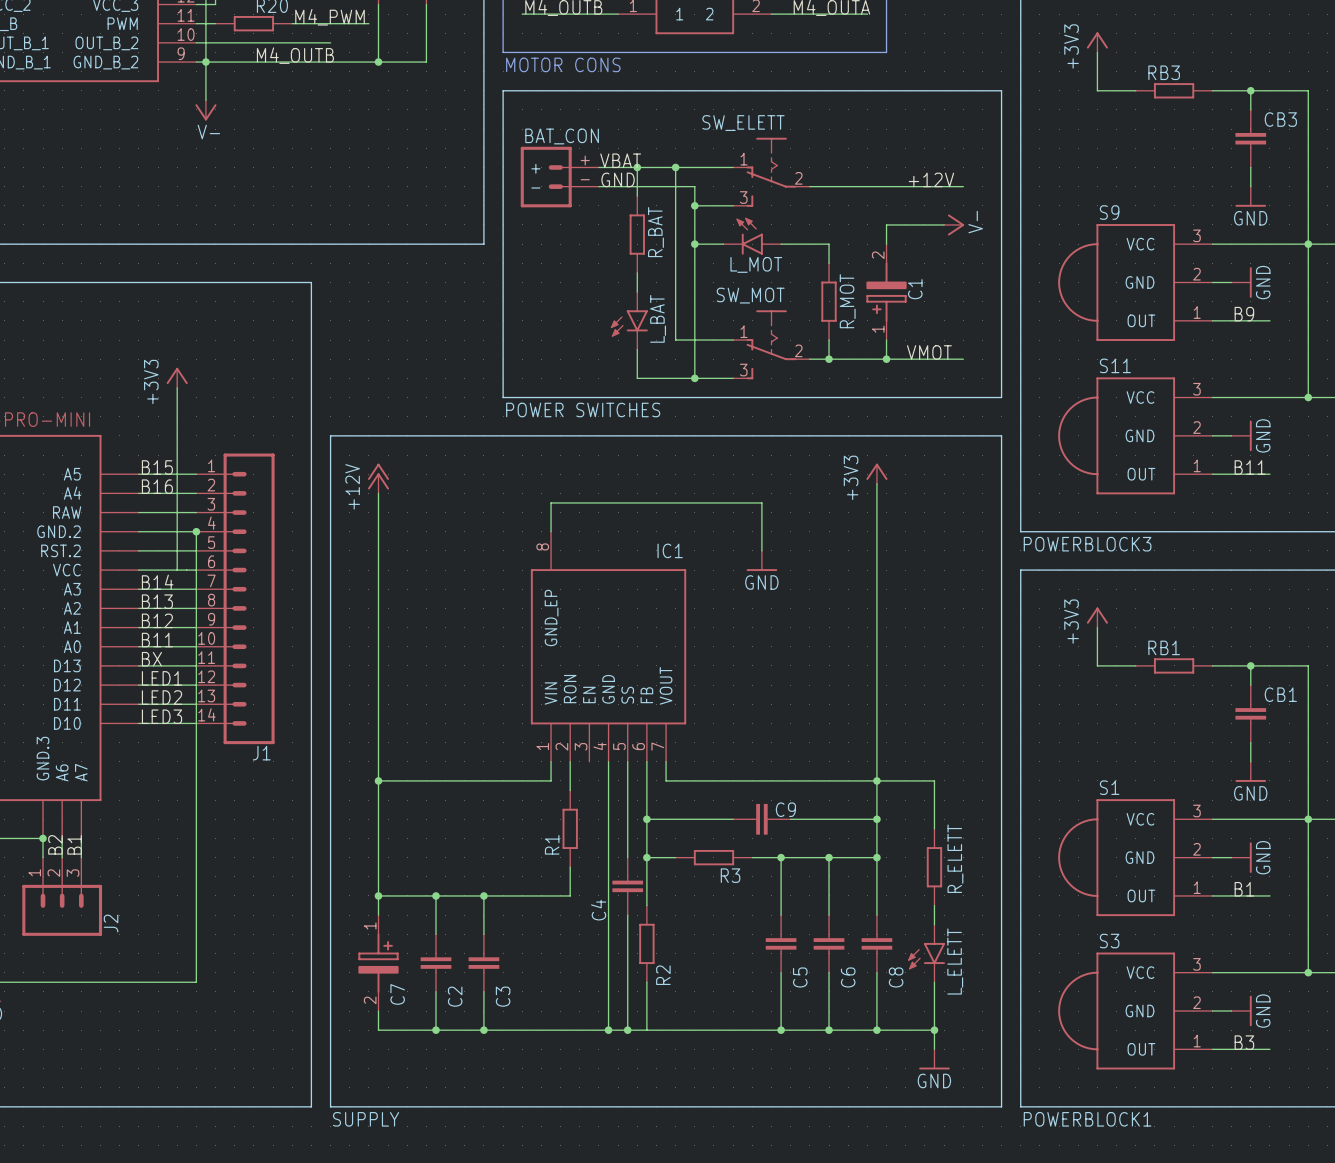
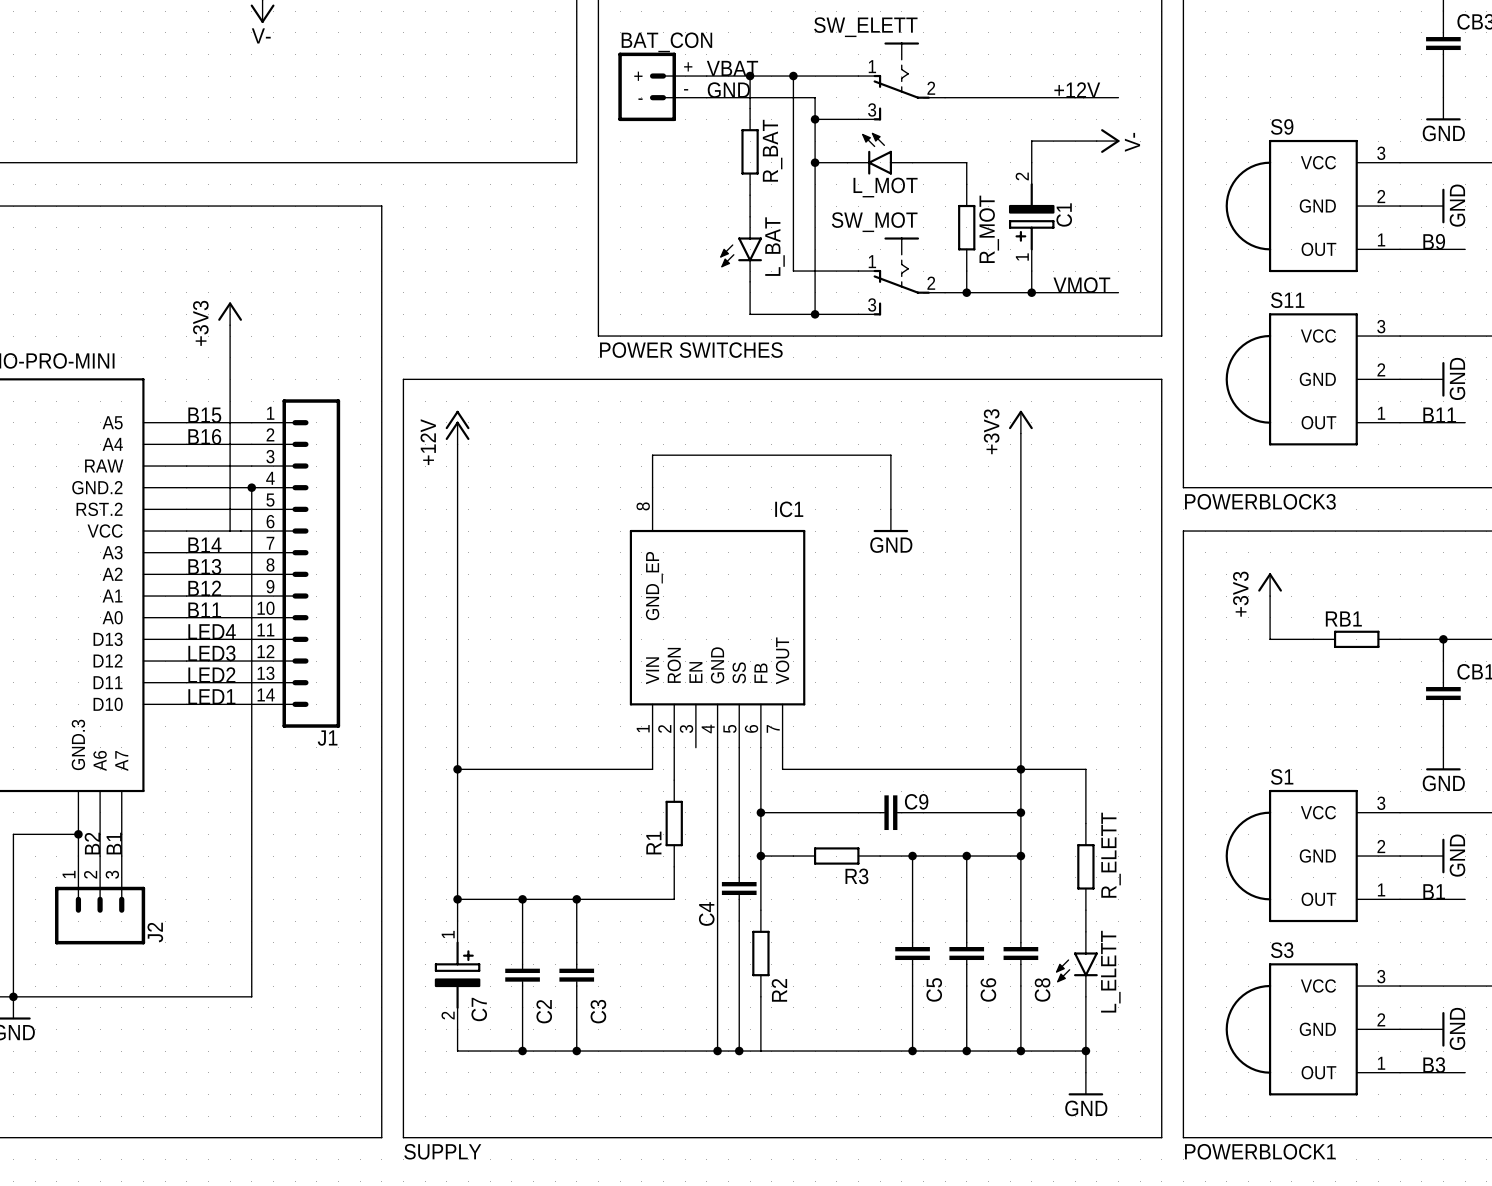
label: BX (151, 659) -> LED4 (212, 631)
label: LED1 (161, 678) -> LED3 (211, 653)
label: LED3 (161, 716) -> LED1 (211, 696)

